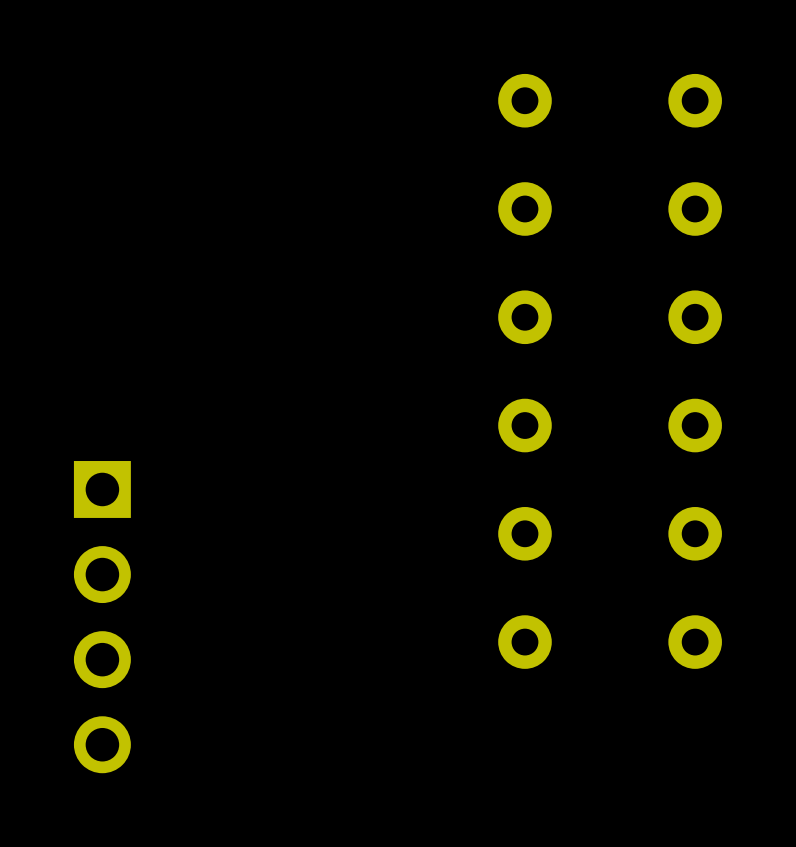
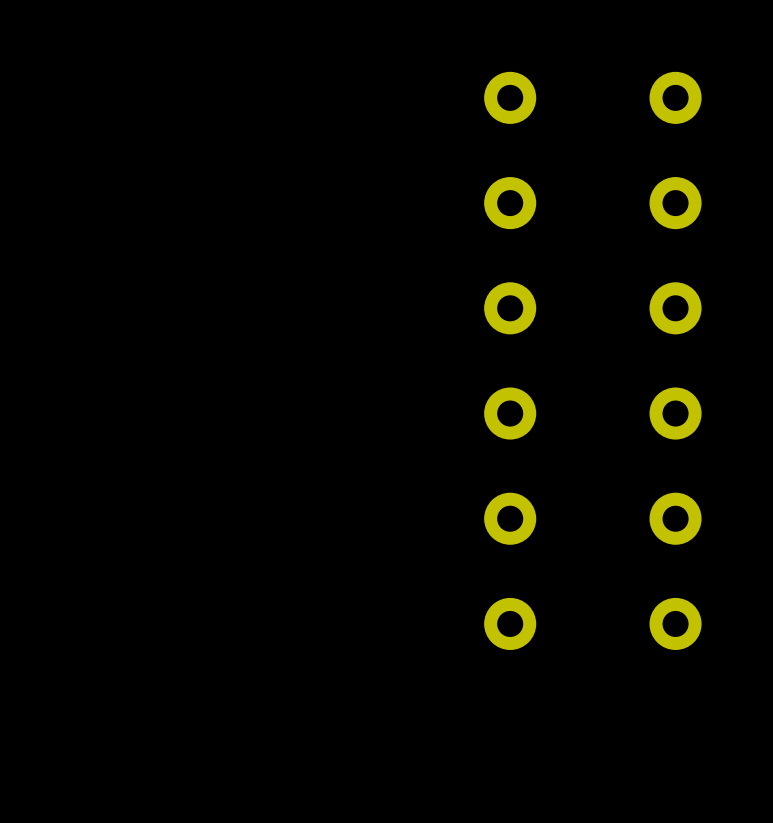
part: (102, 617) -> none

